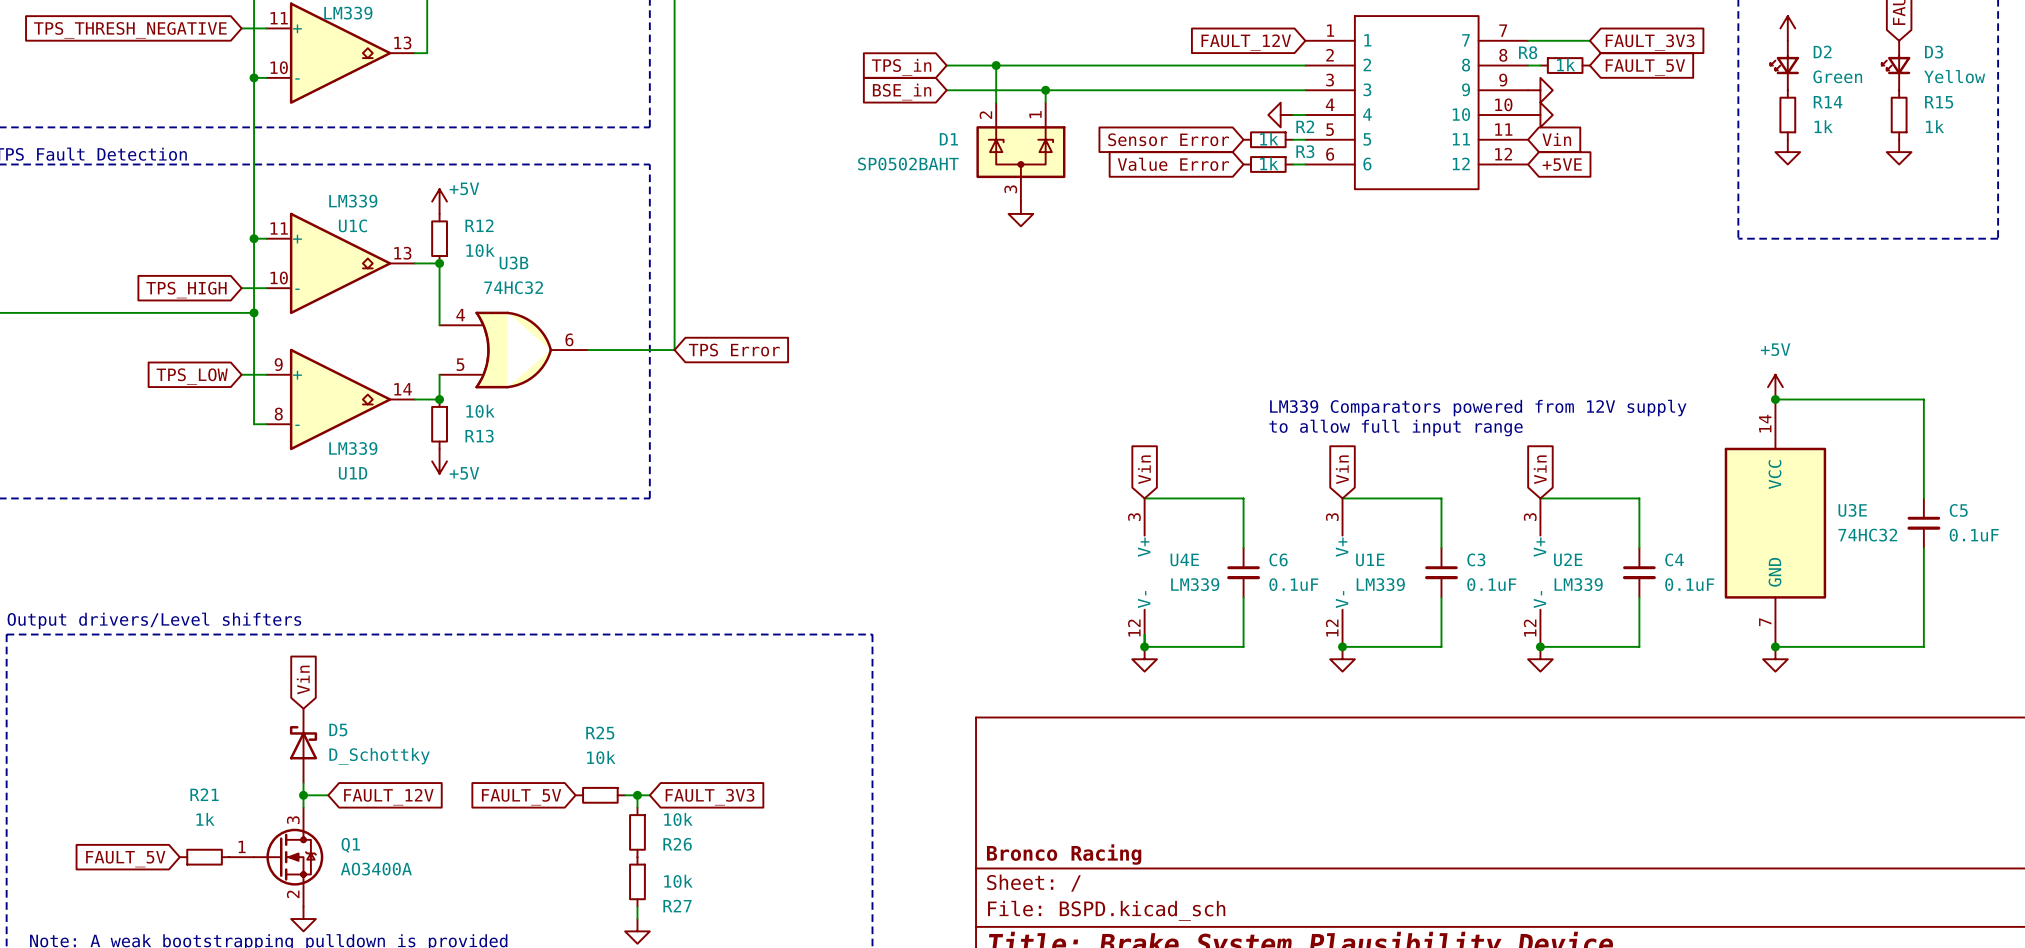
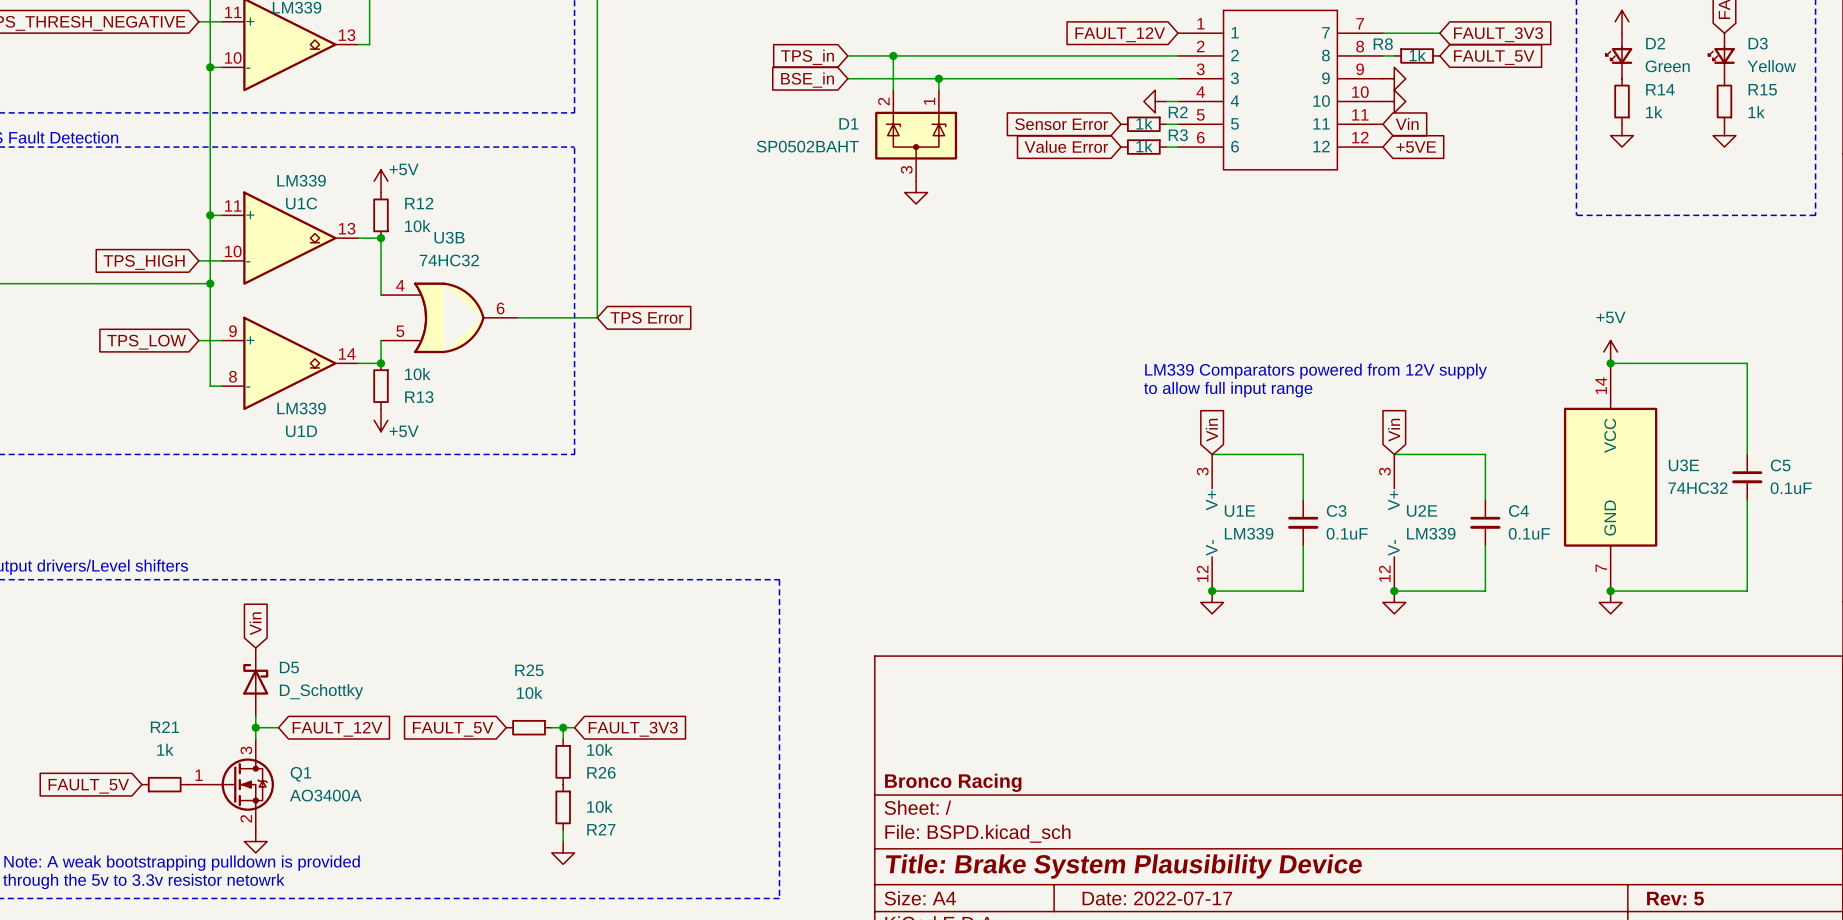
global label: Vin (1144, 469) -> none
wire: (1144, 498) (1243, 498) (1243, 547) -> none
U4E: LM339 (1144, 572) -> none
C6: 0.1uF (1243, 572) -> none
wire: (1243, 597) (1243, 646) (1144, 646) (1144, 634) -> none
junction: (1144, 646) -> none
power symbol: (1144, 659) -> none

